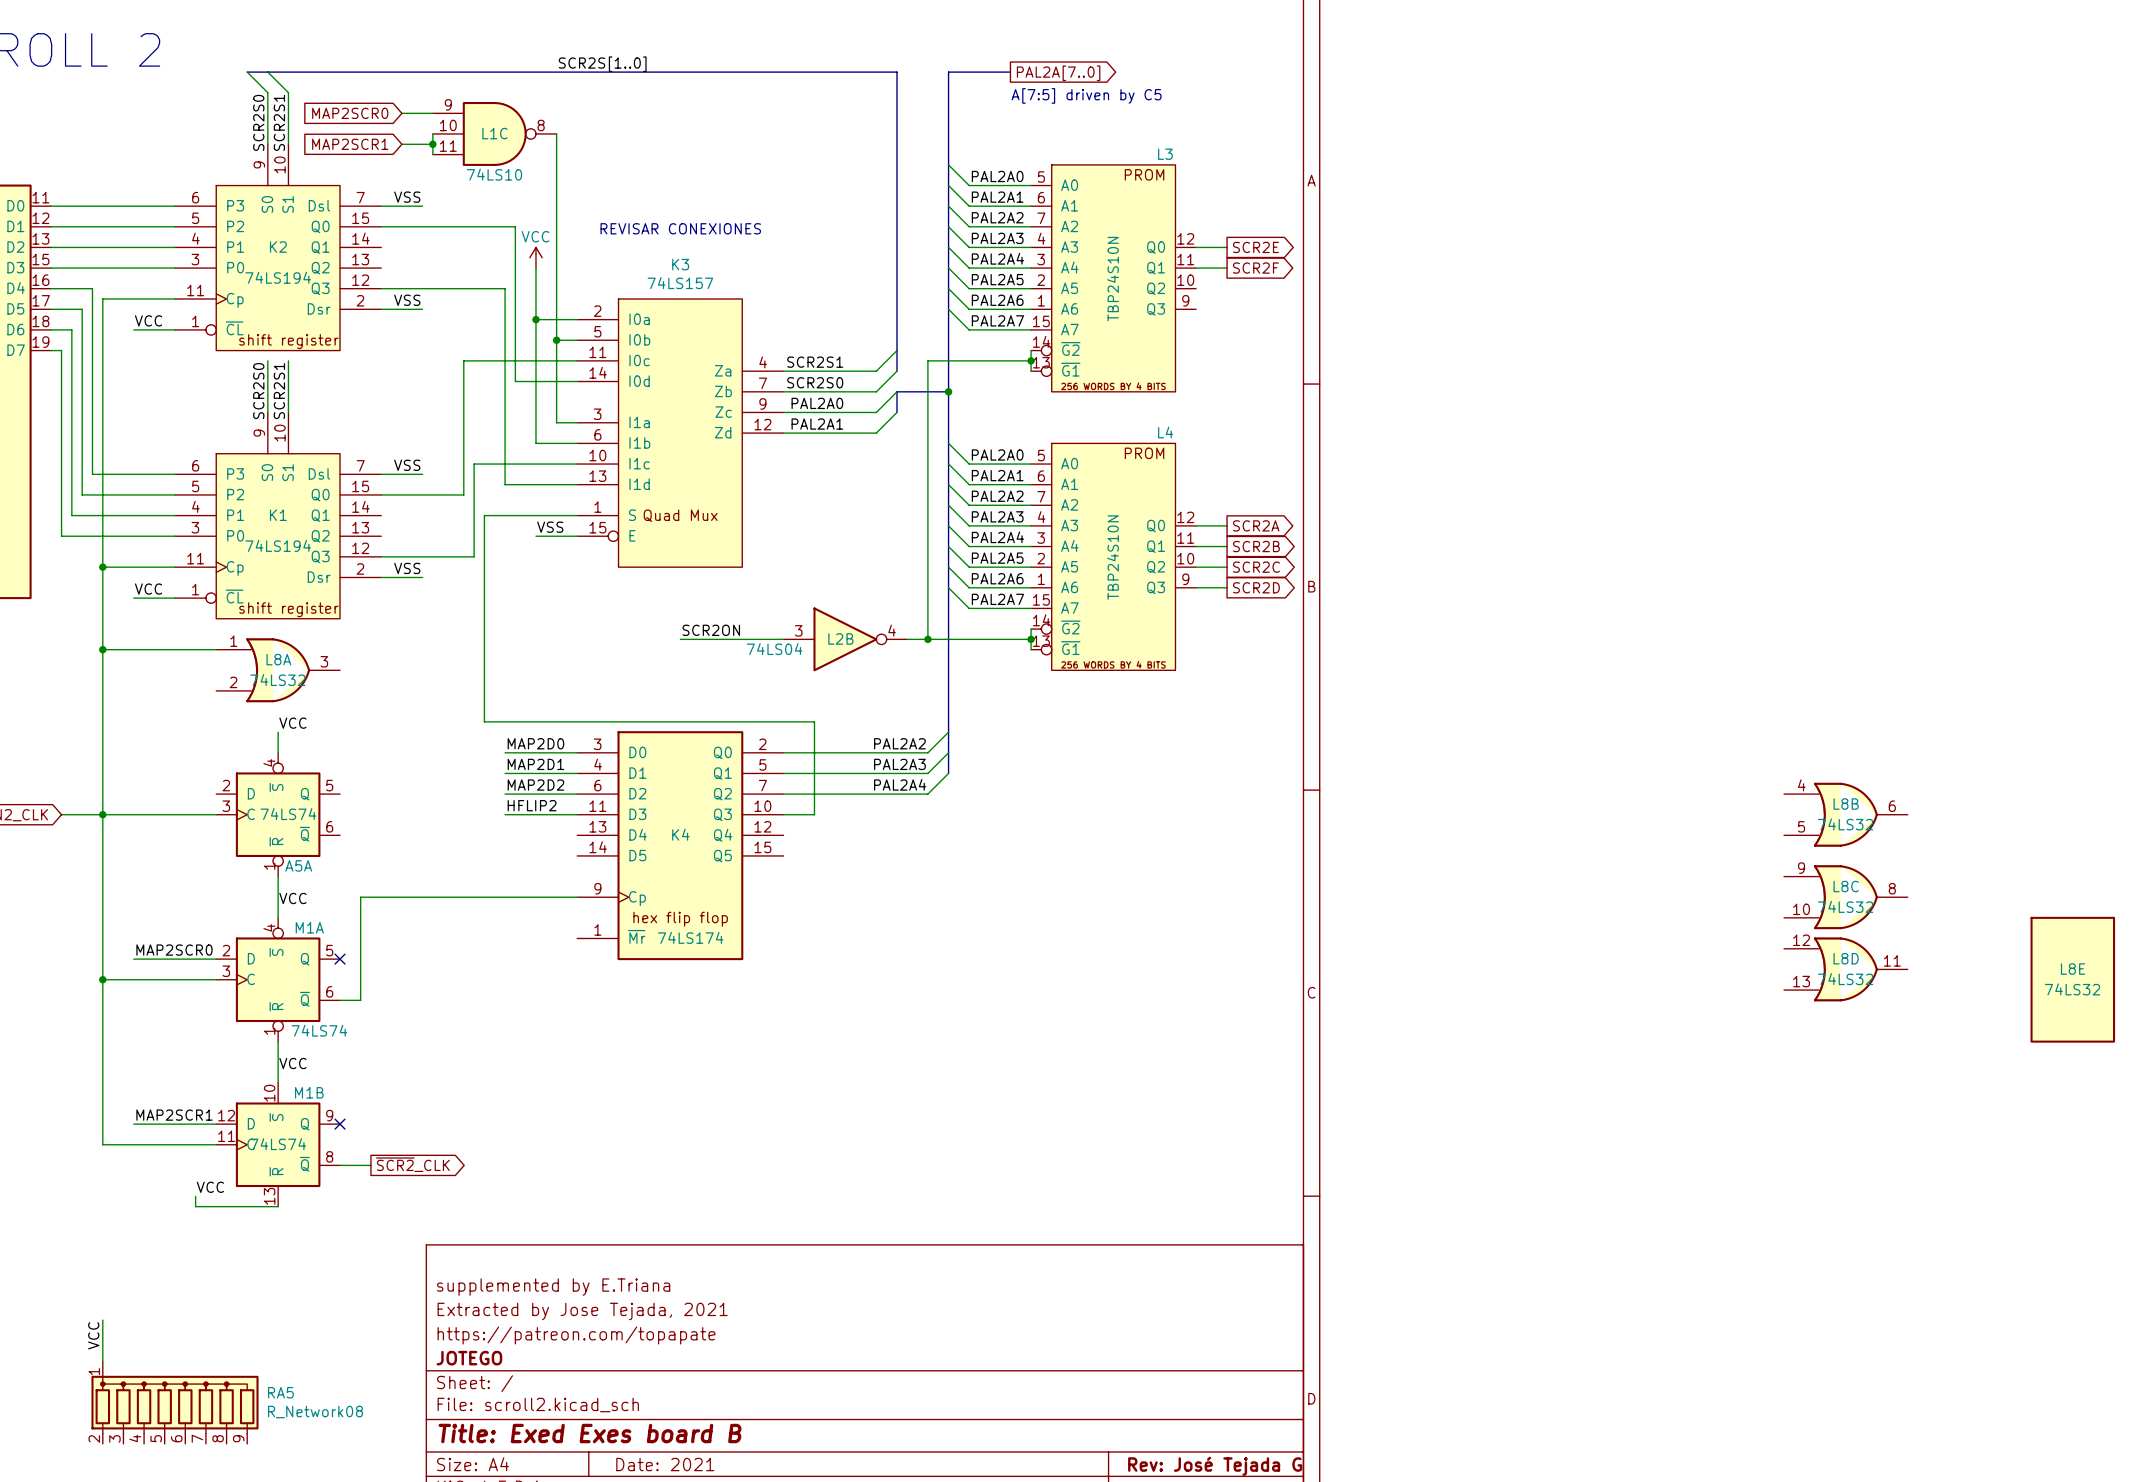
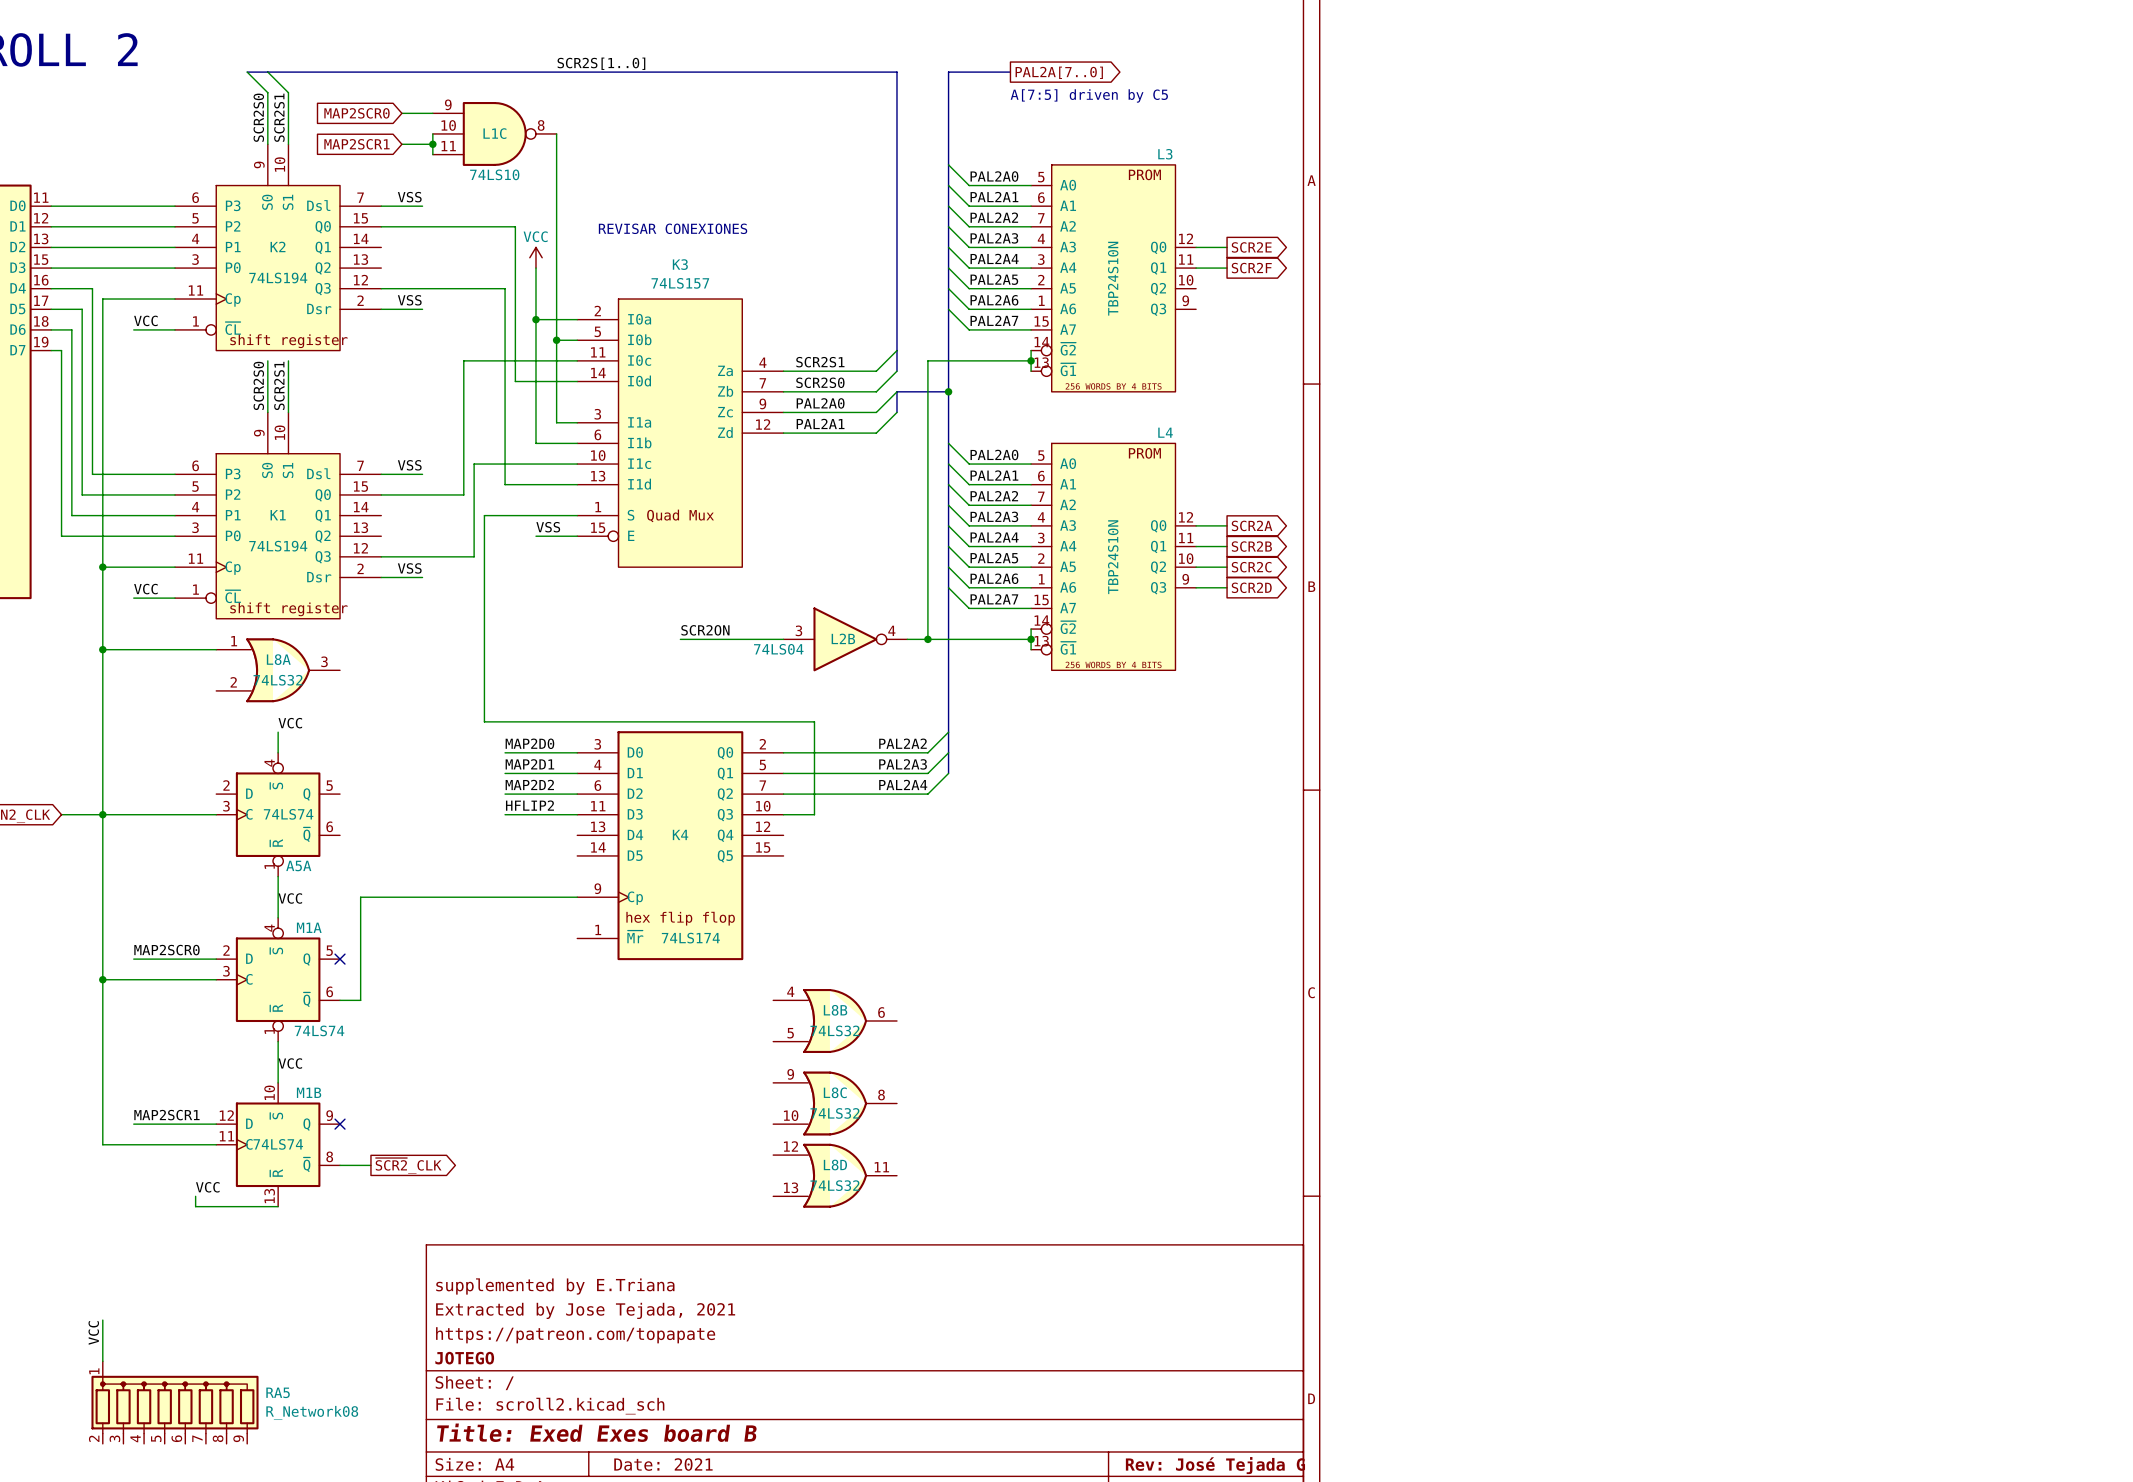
L8B position: (1845, 814) -> (835, 1020)
L8C position: (1845, 897) -> (835, 1103)
L8D position: (1845, 969) -> (835, 1175)
L8E: 74LS32 (2072, 979) -> none

